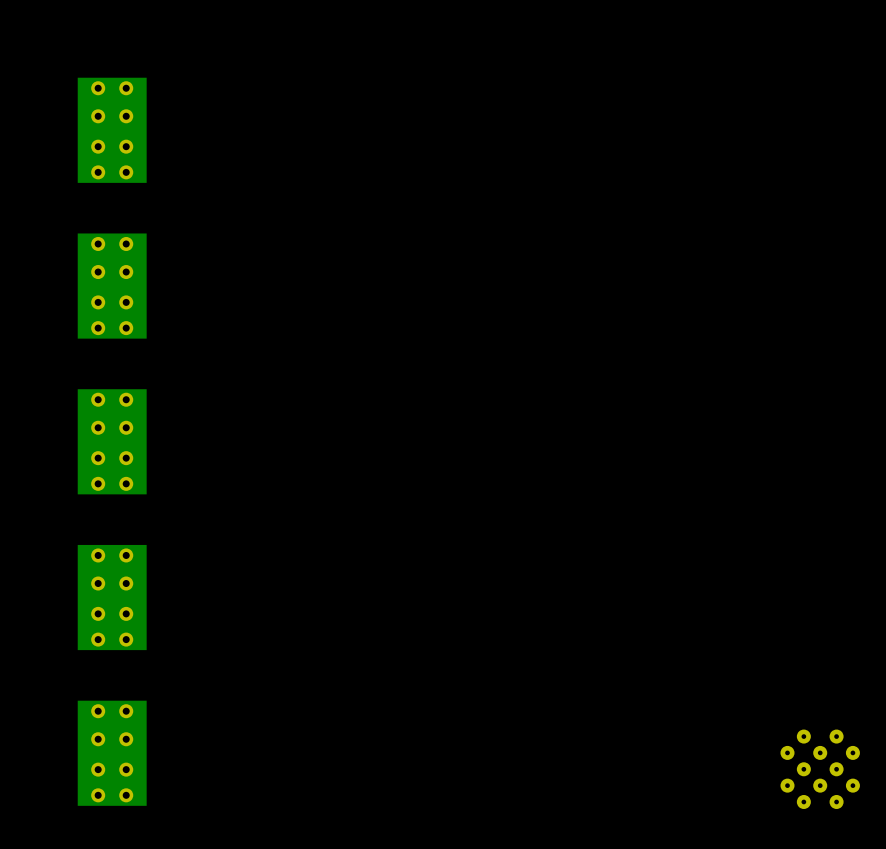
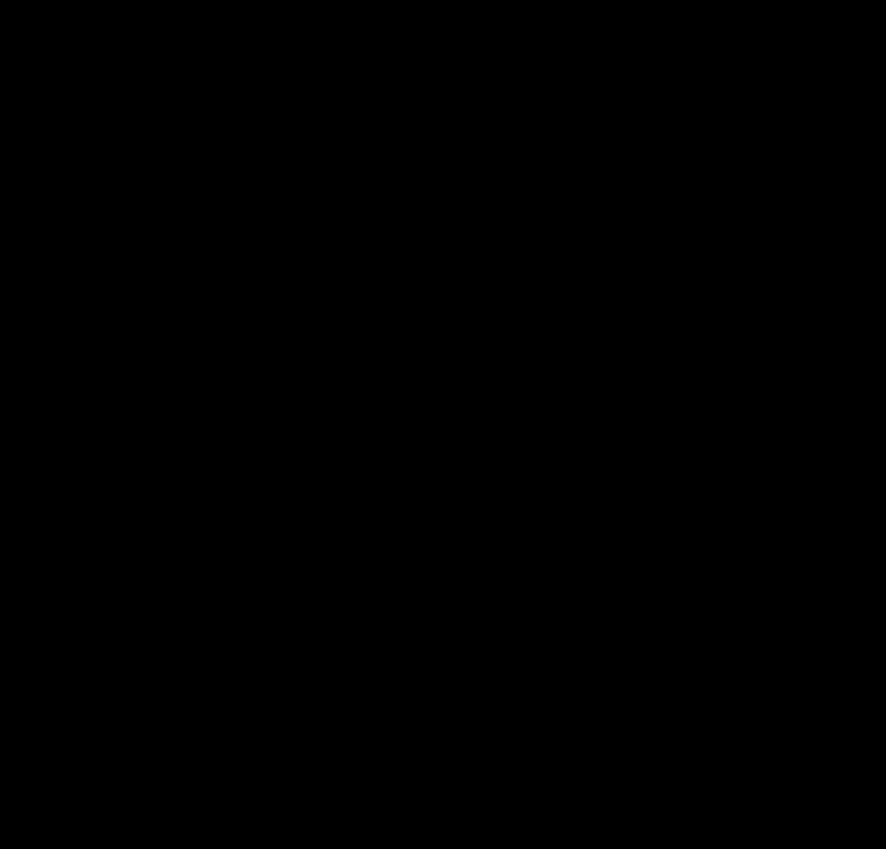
part: (112, 130) -> none
part: (112, 286) -> none
part: (112, 441) -> none
part: (112, 597) -> none
part: (112, 753) -> none
part: (820, 769) -> none

